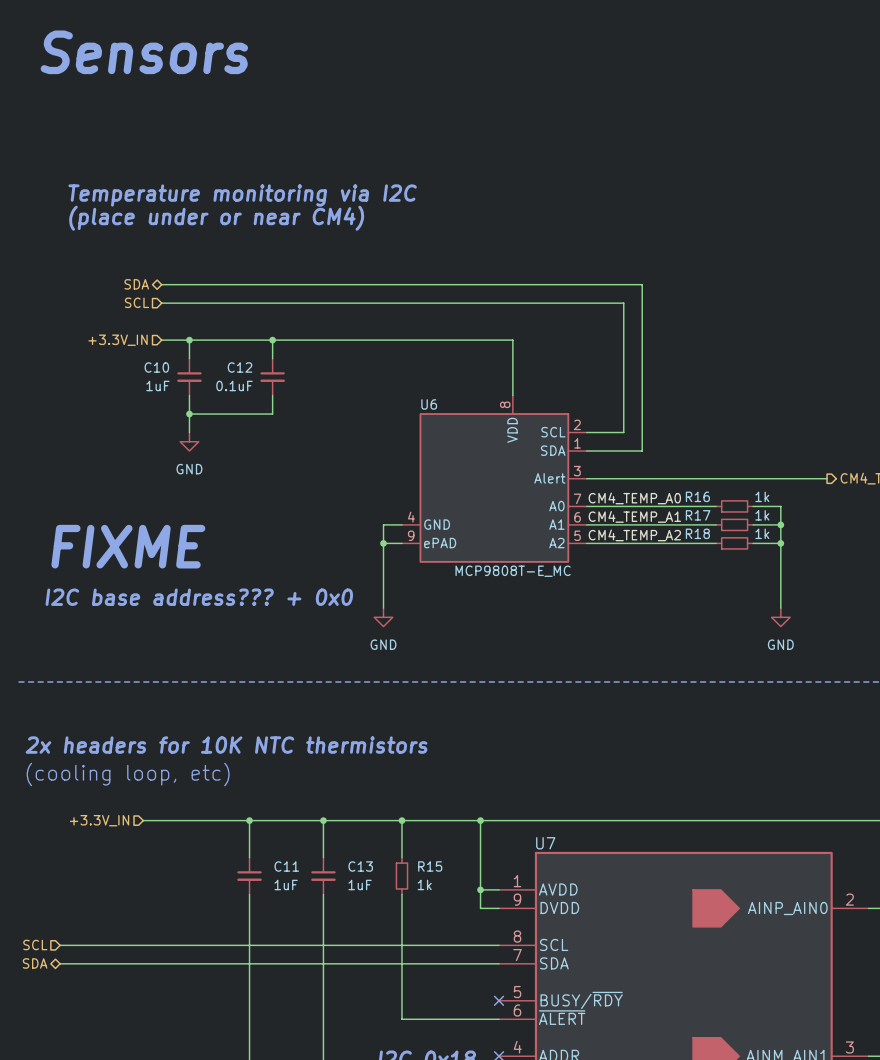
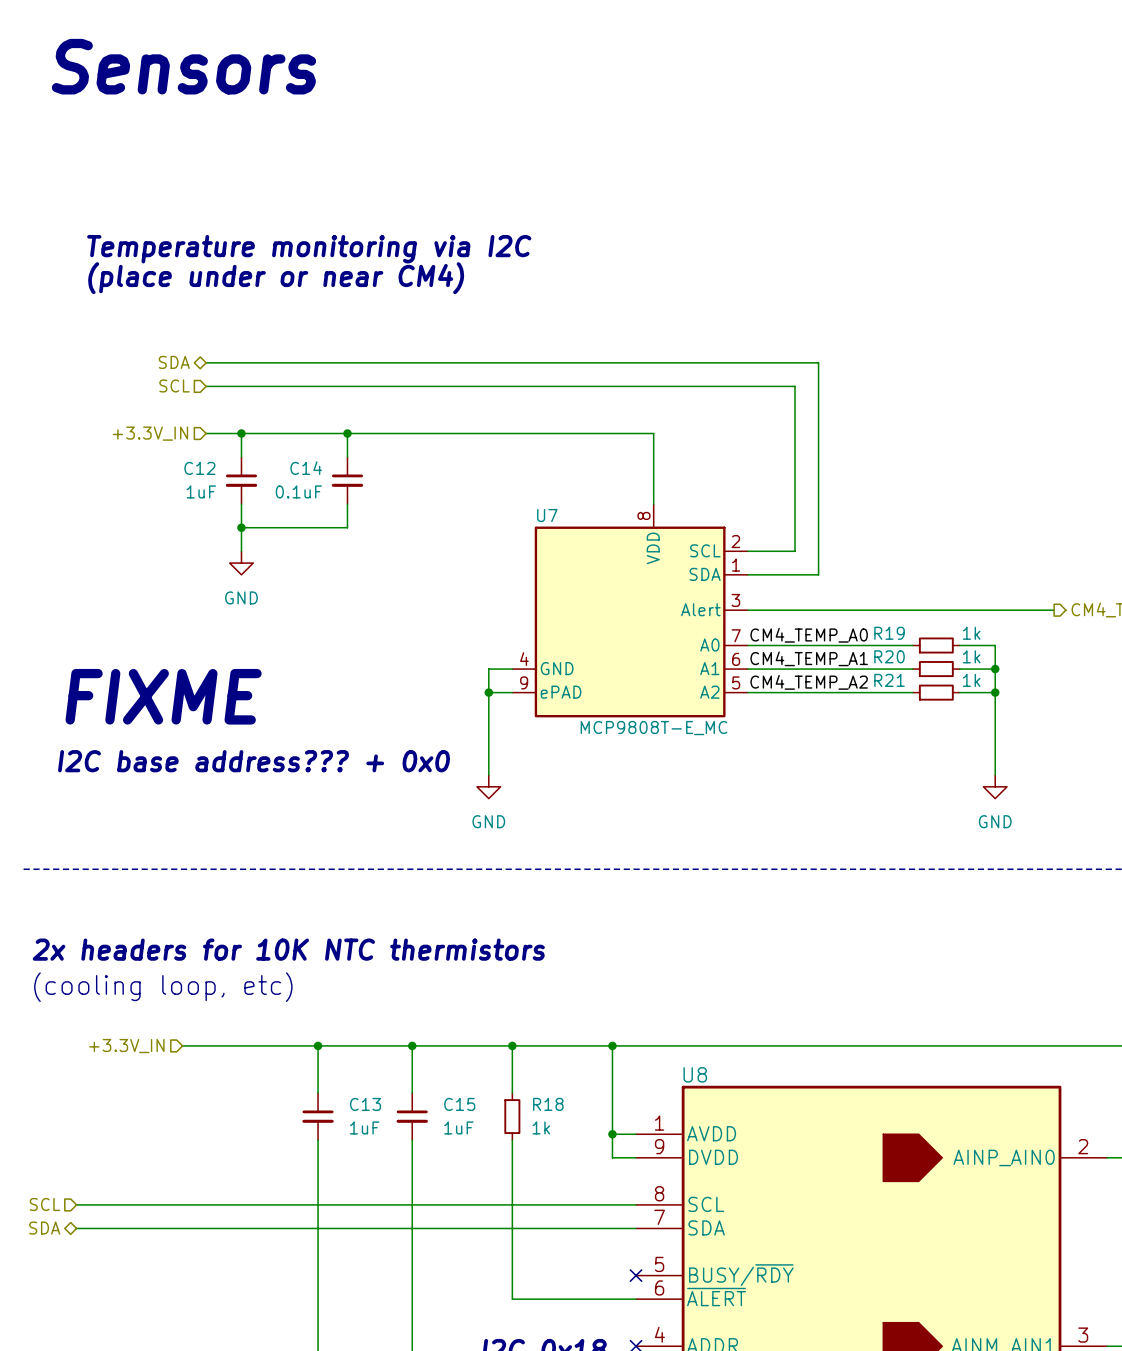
C10 name: C10 (156, 367) -> C12 (199, 468)
C12 name: C12 (239, 367) -> C14 (306, 468)
U6 name: U6 (429, 404) -> U7 (547, 515)
R16 name: R16 (697, 496) -> R19 (889, 633)
R17 name: R17 (698, 515) -> R20 (889, 656)
R18 name: R18 (697, 533) -> R21 (889, 680)
U7 name: U7 (545, 843) -> U8 (695, 1074)
C11 name: C11 (286, 866) -> C13 (365, 1104)
C13 name: C13 (360, 866) -> C15 (459, 1104)
R15 name: R15 (430, 866) -> R18 (548, 1104)

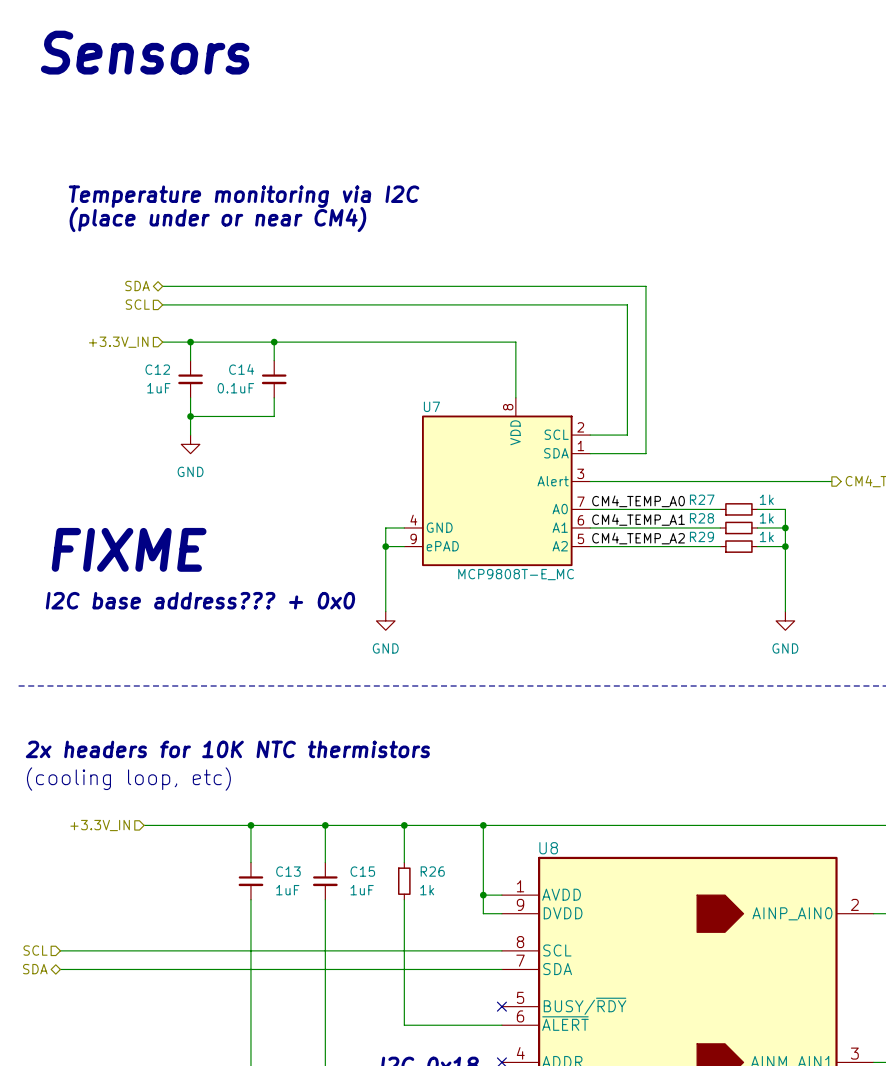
R19 name: R19 (889, 633) -> R27 (702, 499)
R20 name: R20 (889, 656) -> R28 (701, 518)
R21 name: R21 (889, 680) -> R29 (701, 536)
R18 name: R18 (548, 1104) -> R26 (432, 871)

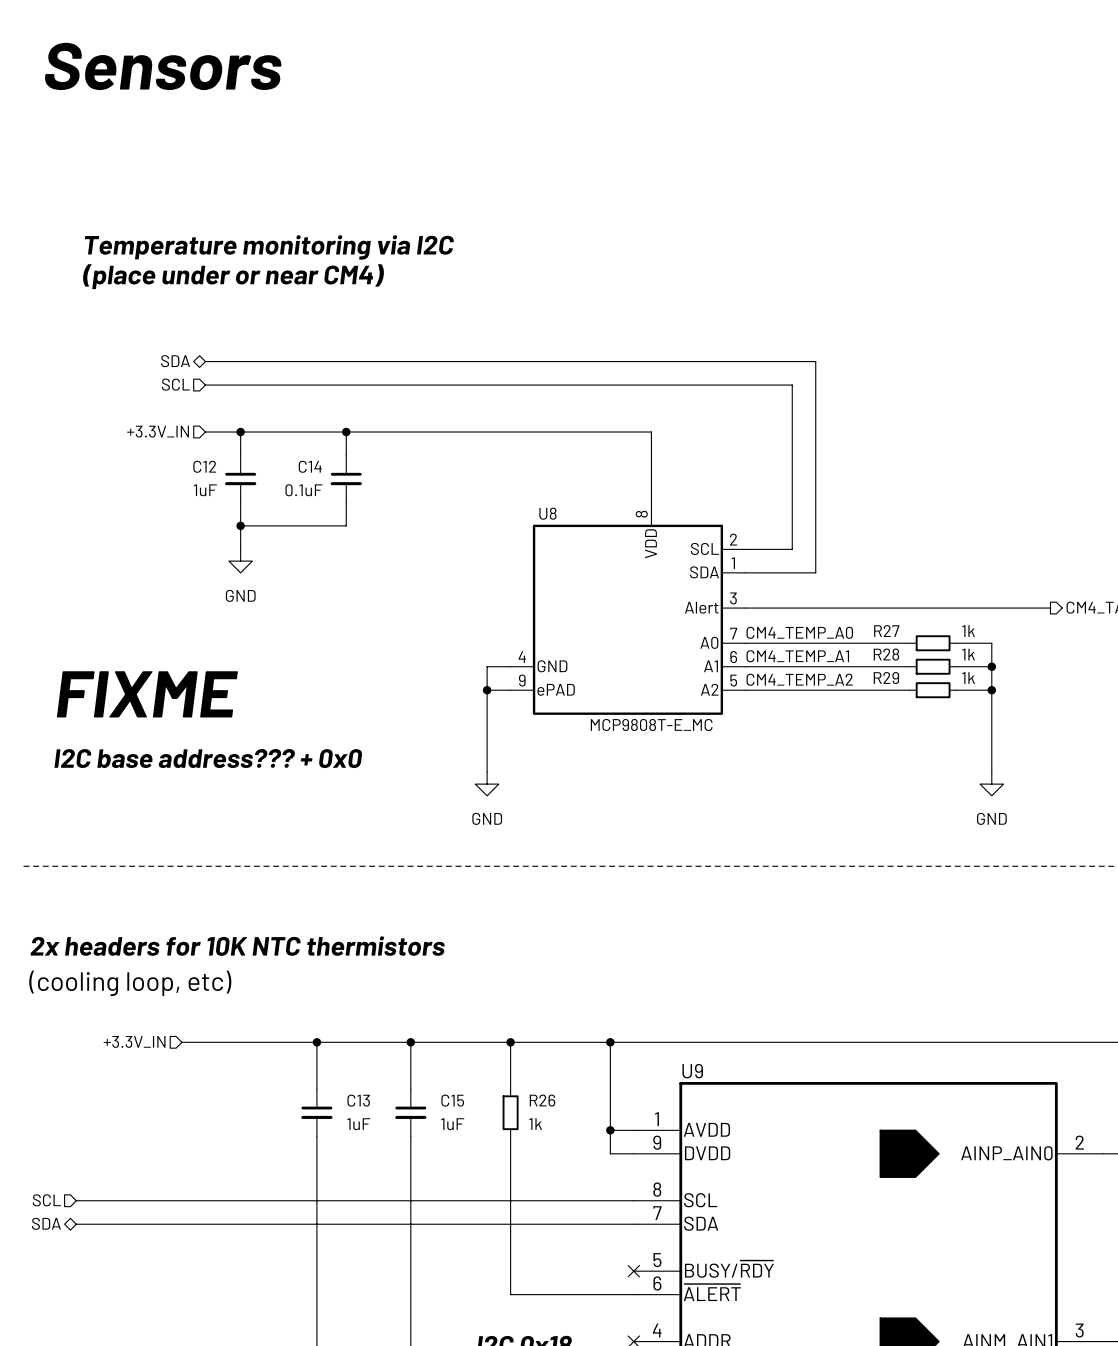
U7 name: U7 (431, 406) -> U8 (547, 513)
U8 name: U8 (548, 848) -> U9 (692, 1071)

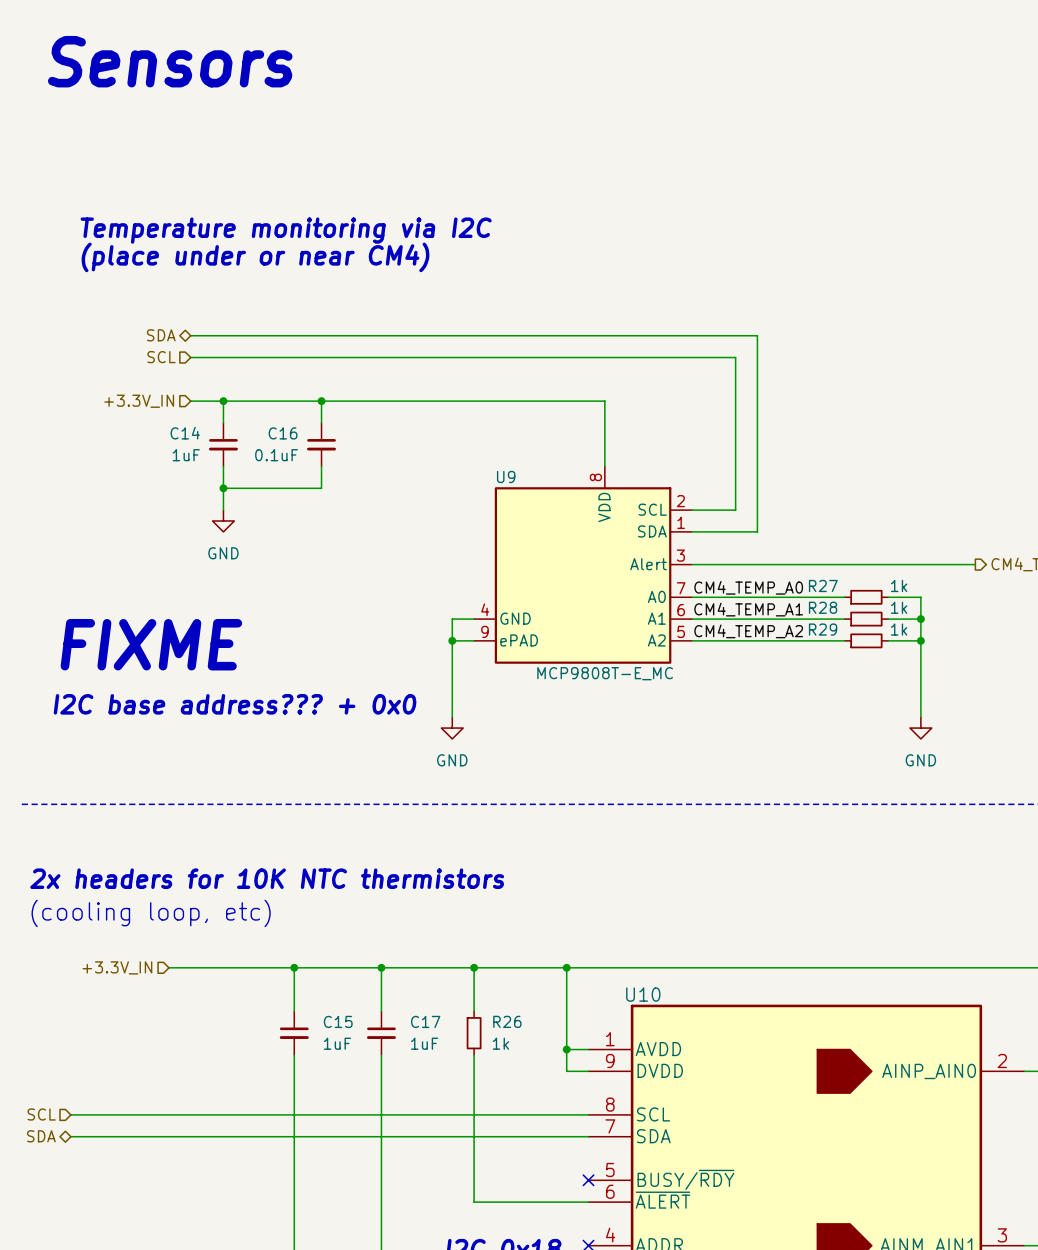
C12 name: C12 (204, 466) -> C14 (185, 433)
C14 name: C14 (310, 466) -> C16 (283, 433)
U8 name: U8 (547, 513) -> U9 (506, 477)
U9 name: U9 (692, 1071) -> U10 (643, 994)
C13 name: C13 (358, 1100) -> C15 (338, 1021)
C15 name: C15 (452, 1100) -> C17 (425, 1021)

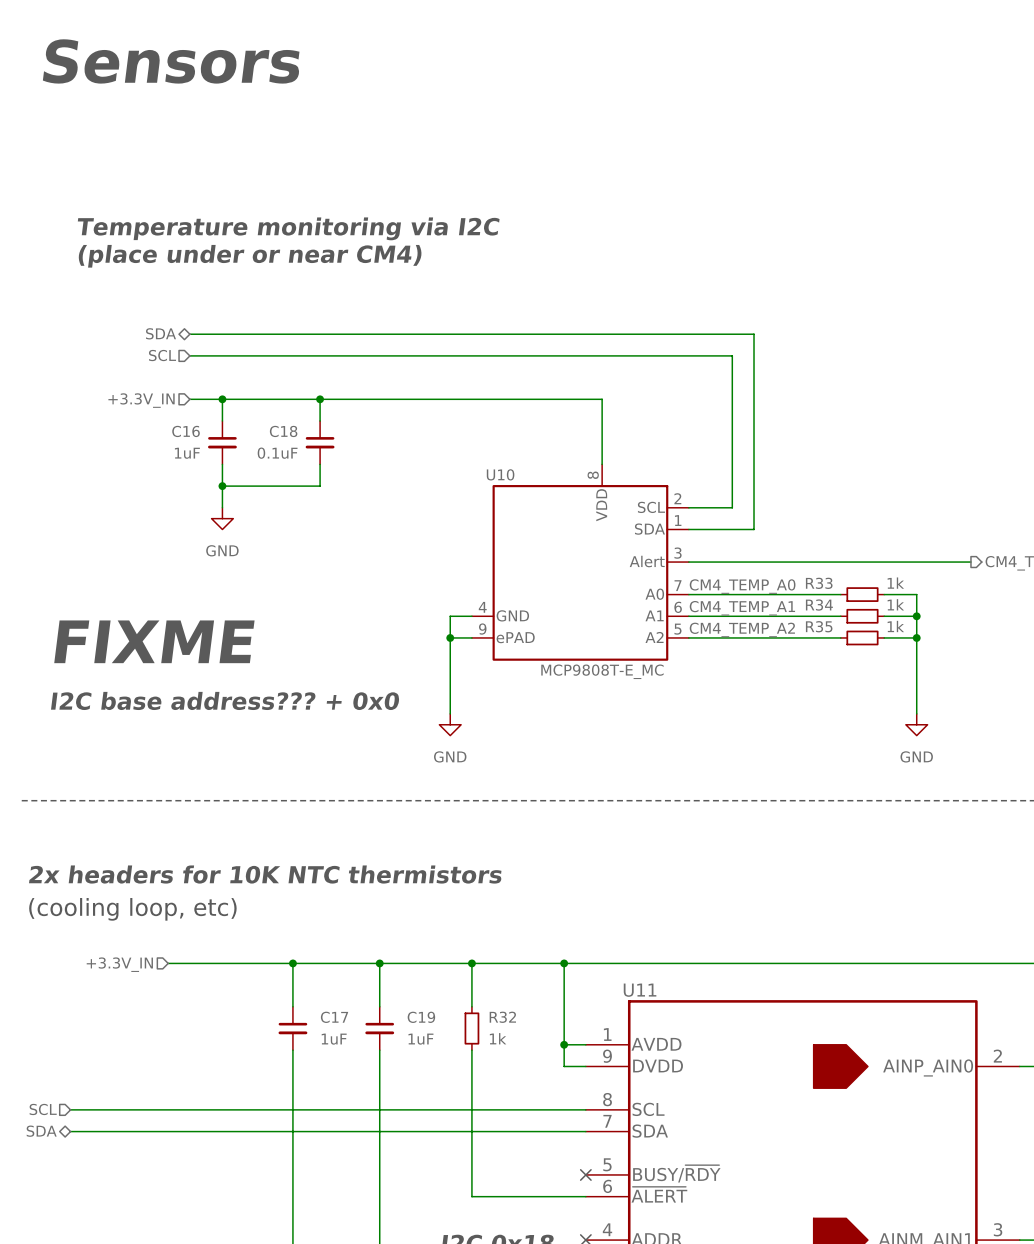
C14 name: C14 (185, 433) -> C16 (186, 431)
C16 name: C16 (283, 433) -> C18 (283, 431)
U9 name: U9 (506, 477) -> U10 (500, 474)
R27 name: R27 (823, 585) -> R33 (819, 583)
R28 name: R28 (823, 607) -> R34 (819, 605)
R29 name: R29 (823, 629) -> R35 (819, 626)
U10 name: U10 (643, 994) -> U11 (640, 990)
C15 name: C15 (338, 1021) -> C17 (334, 1017)
C17 name: C17 (425, 1021) -> C19 (421, 1017)
R26 name: R26 (507, 1021) -> R32 (502, 1017)

